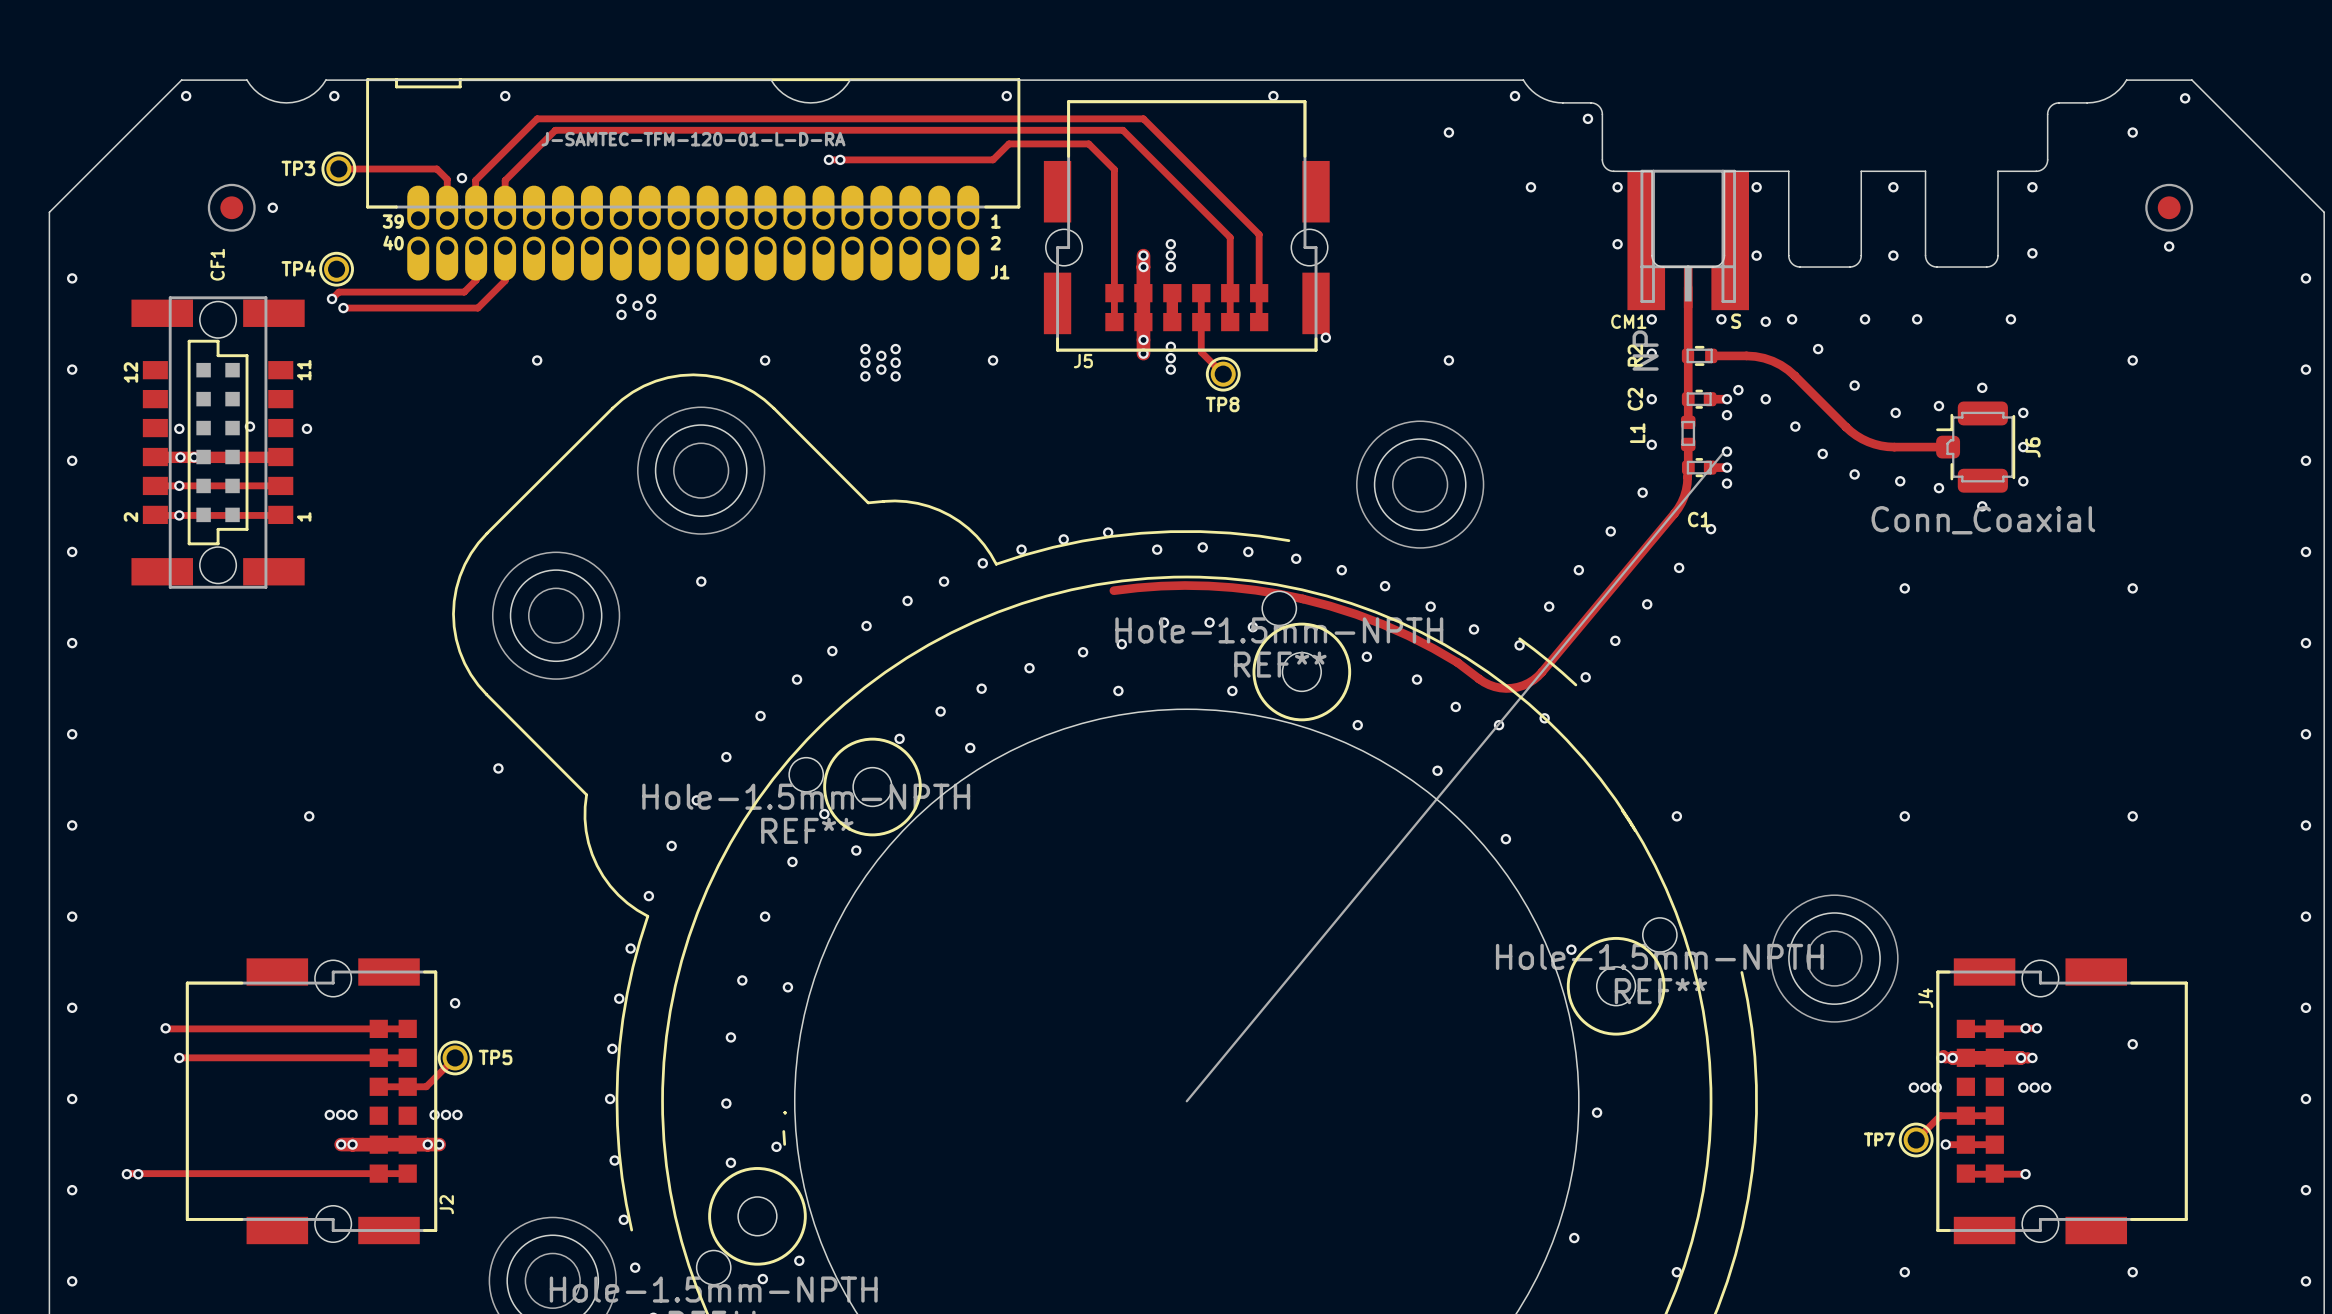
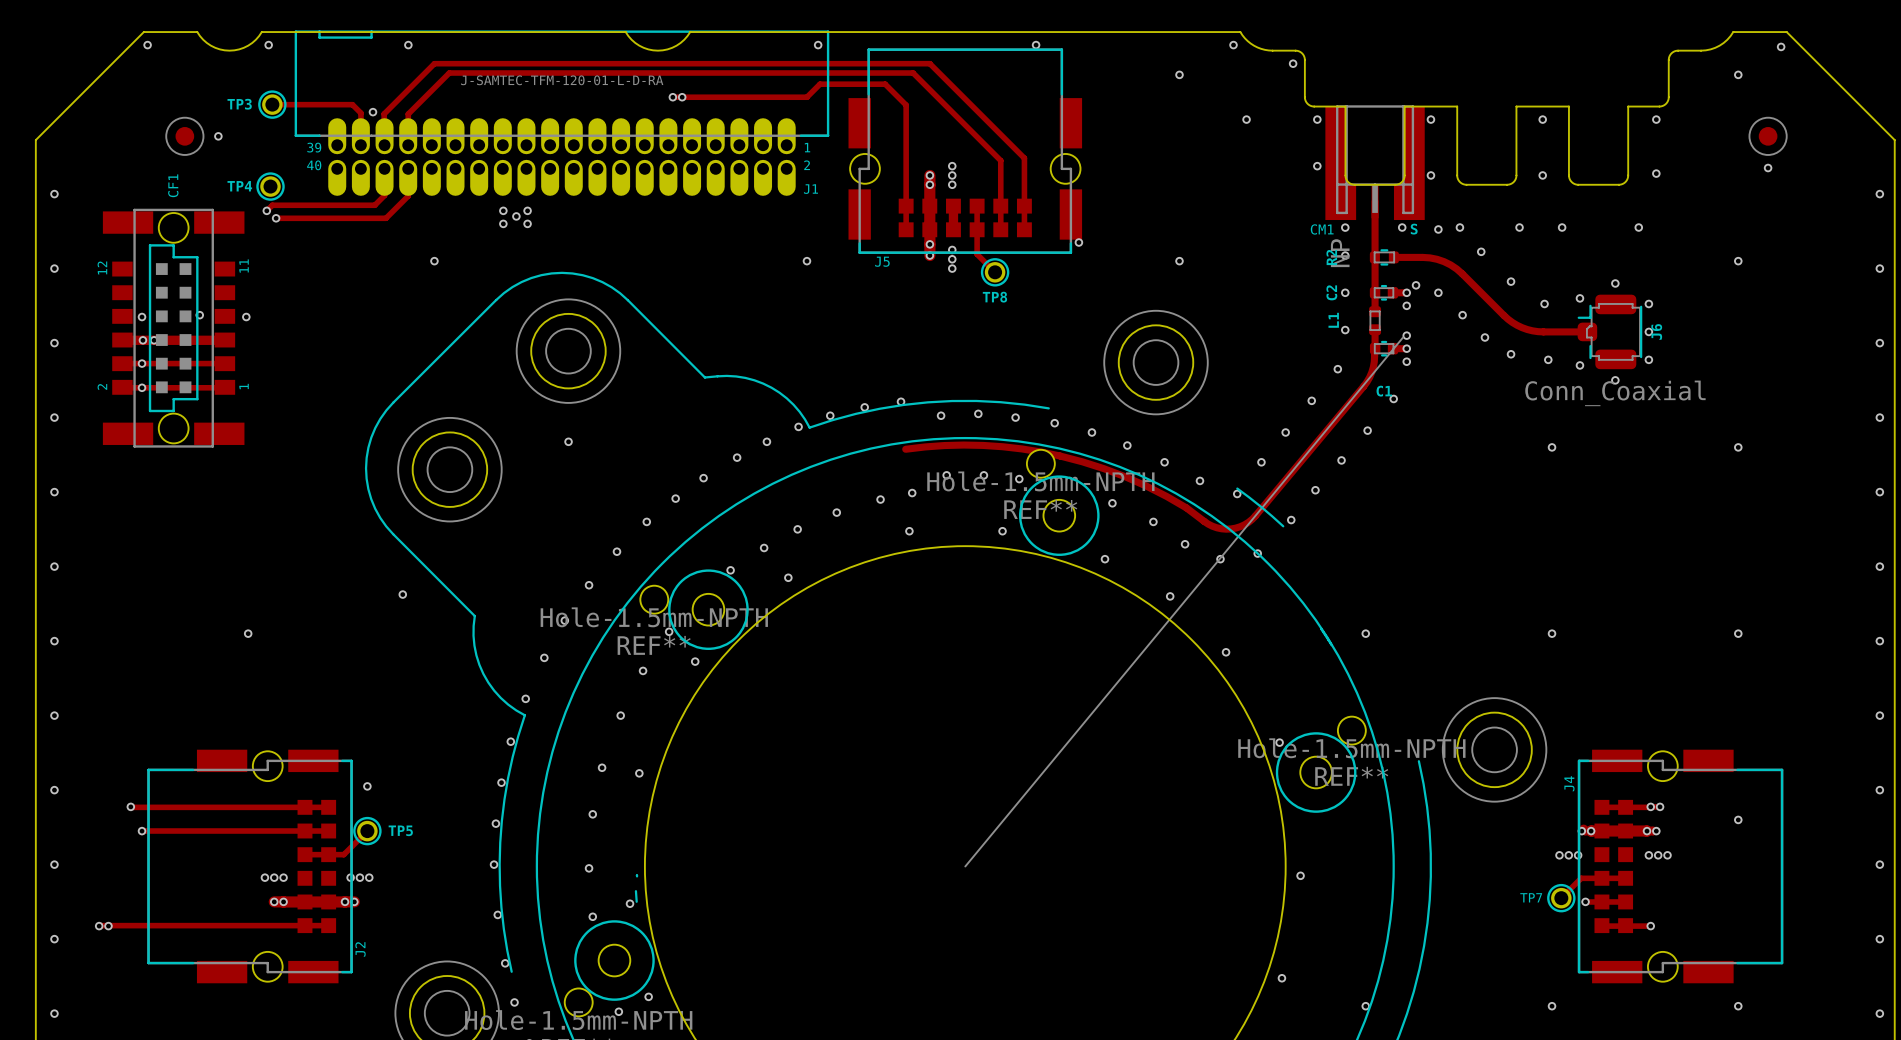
via: (865, 349) -> none
via: (895, 349) -> none
via: (881, 355) -> none
via: (765, 360) -> none
via: (865, 362) -> none
via: (895, 362) -> none
via: (881, 369) -> none
via: (865, 376) -> none
via: (895, 376) -> none

